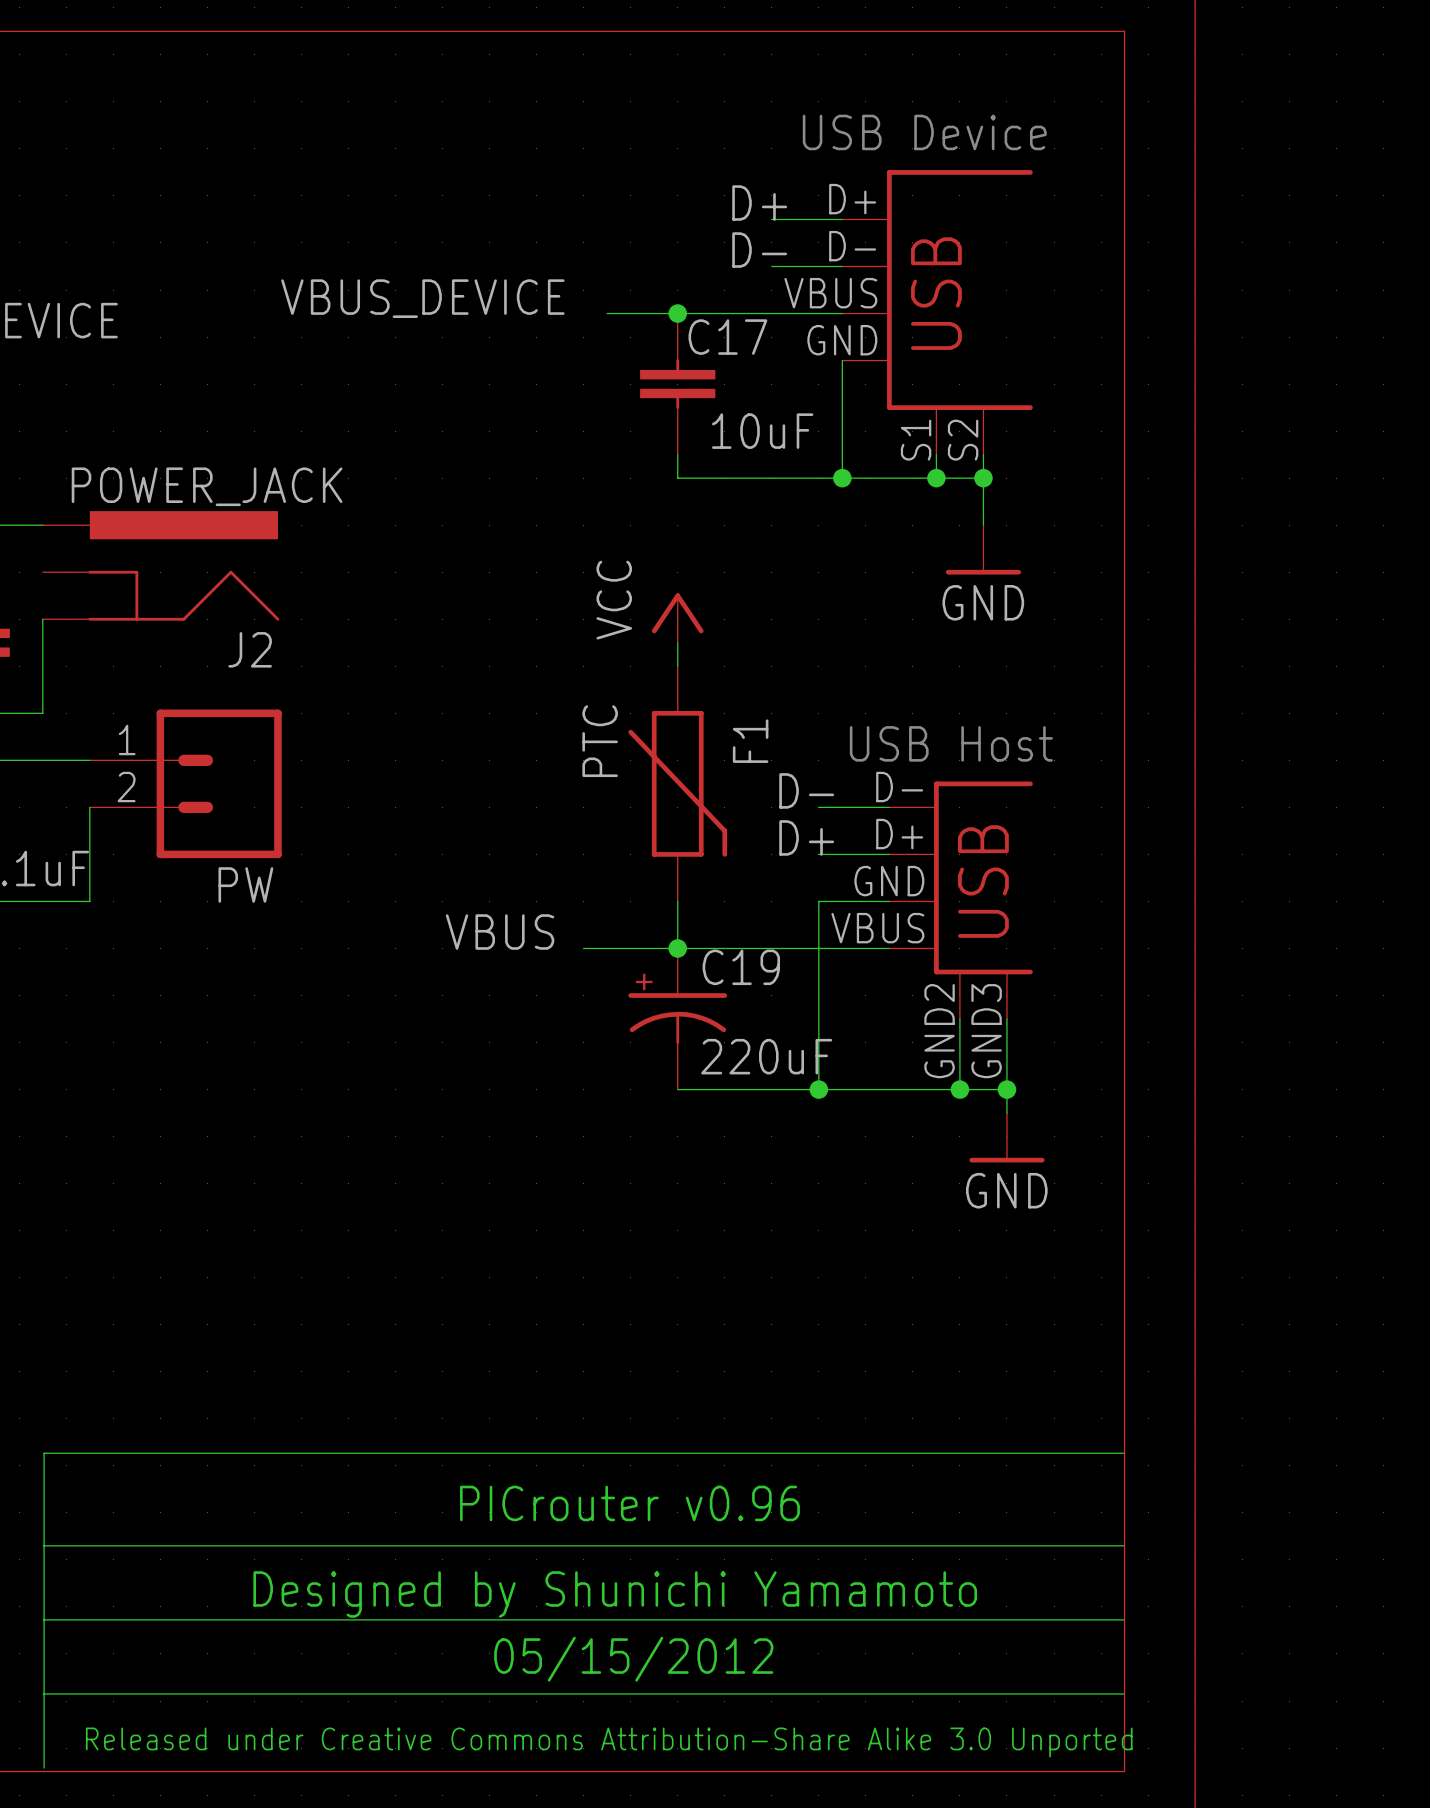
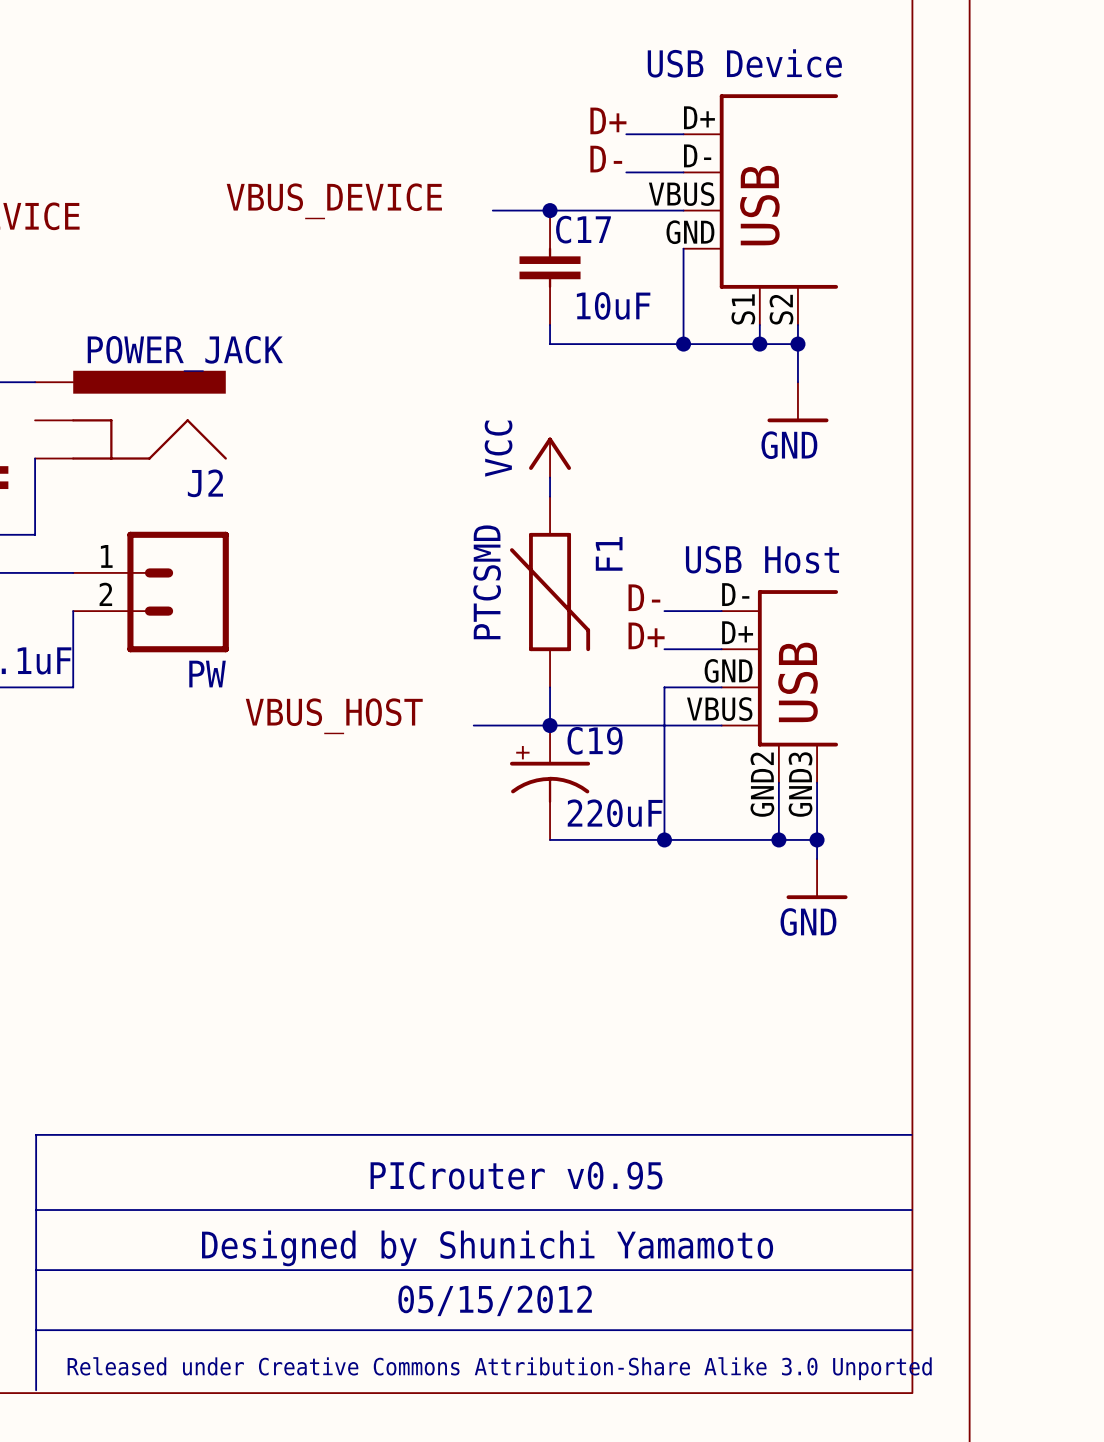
F1 value: PTC (600, 741) -> PTCSMD (487, 582)
label: VBUS (500, 932) -> VBUS_HOST (334, 716)
text: PICrouter v0.96 (629, 1503) -> PICrouter v0.95 (516, 1175)

